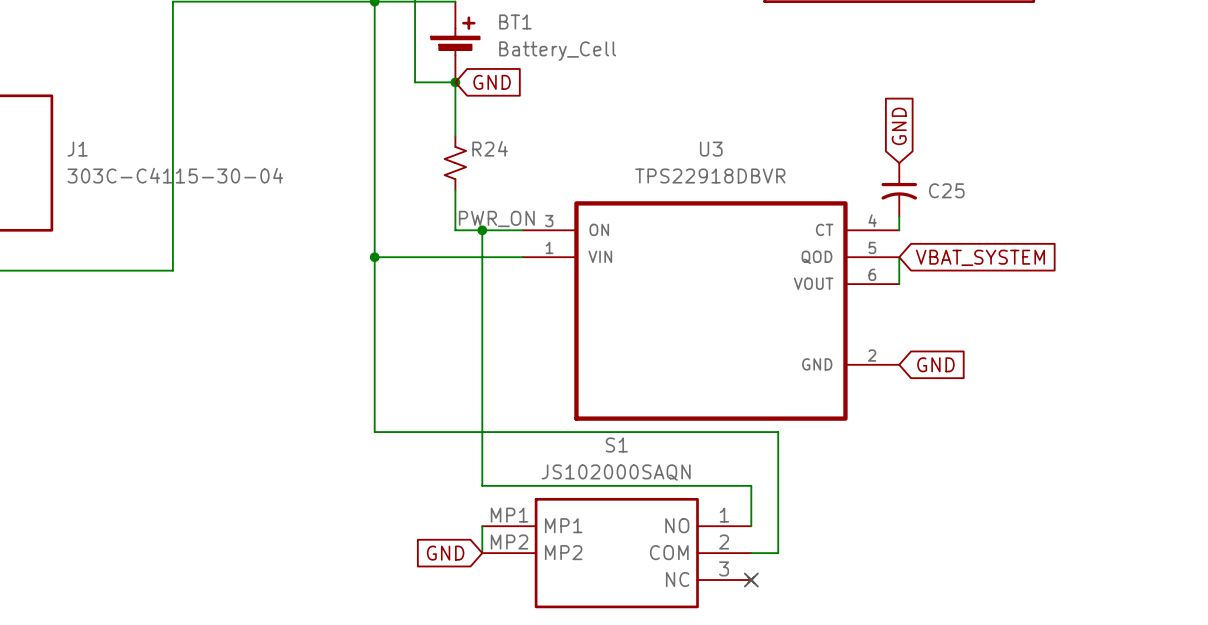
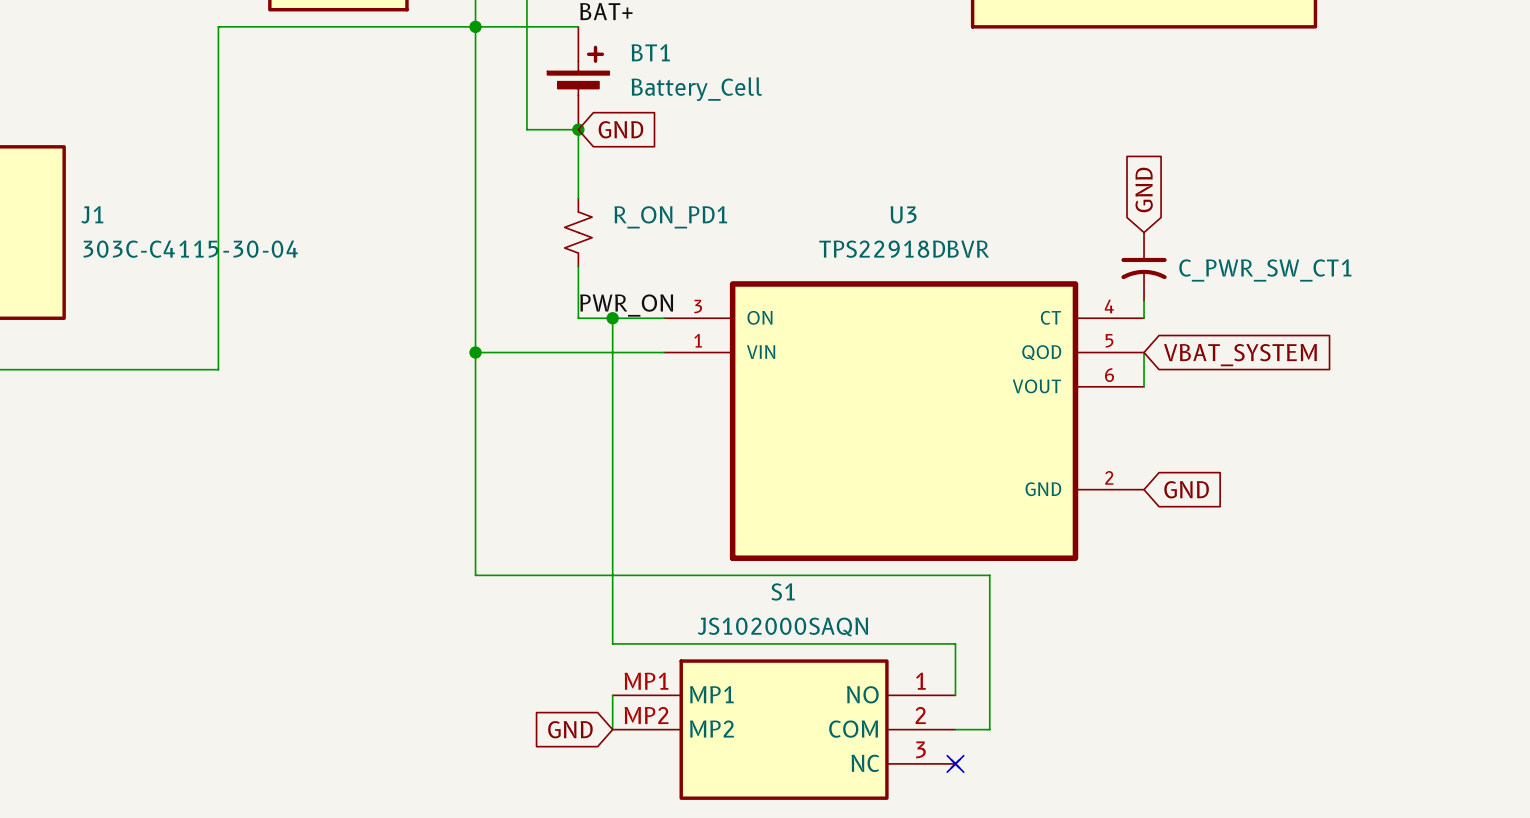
R24 name: R24 (490, 148) -> R_ON_PD1 (670, 217)
C25 name: C25 (946, 190) -> C_PWR_SW_CT1 (1265, 270)

